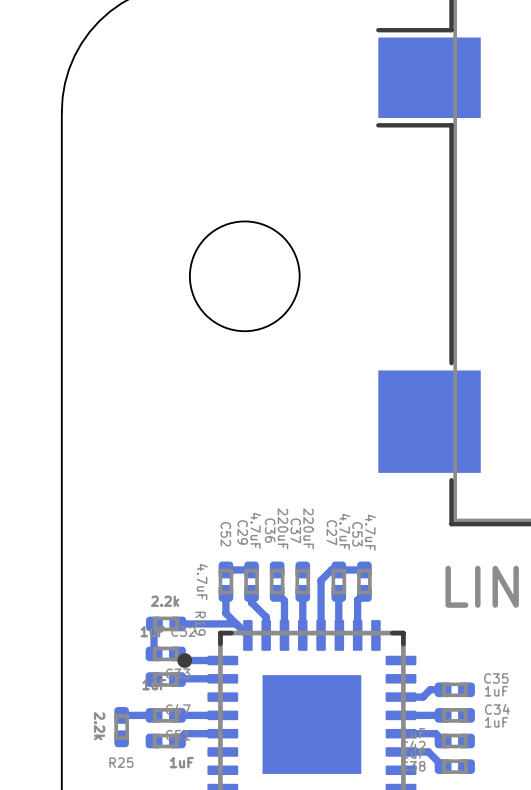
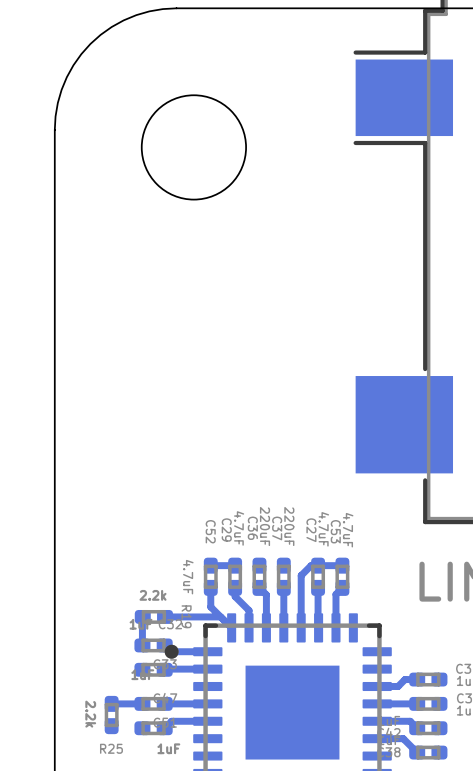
round board edge position: (244, 276) -> (193, 147)

